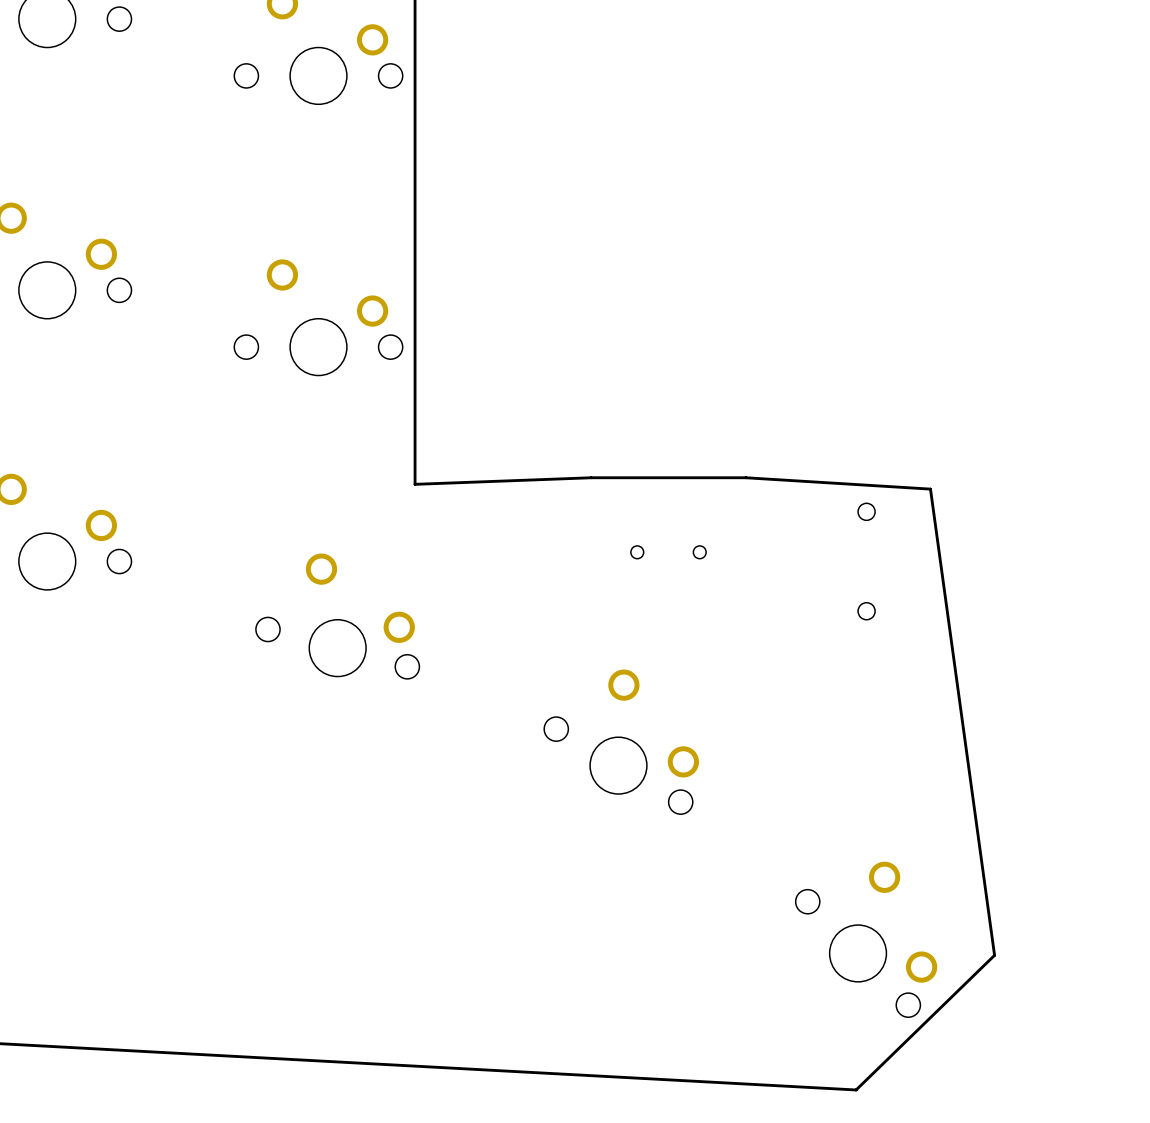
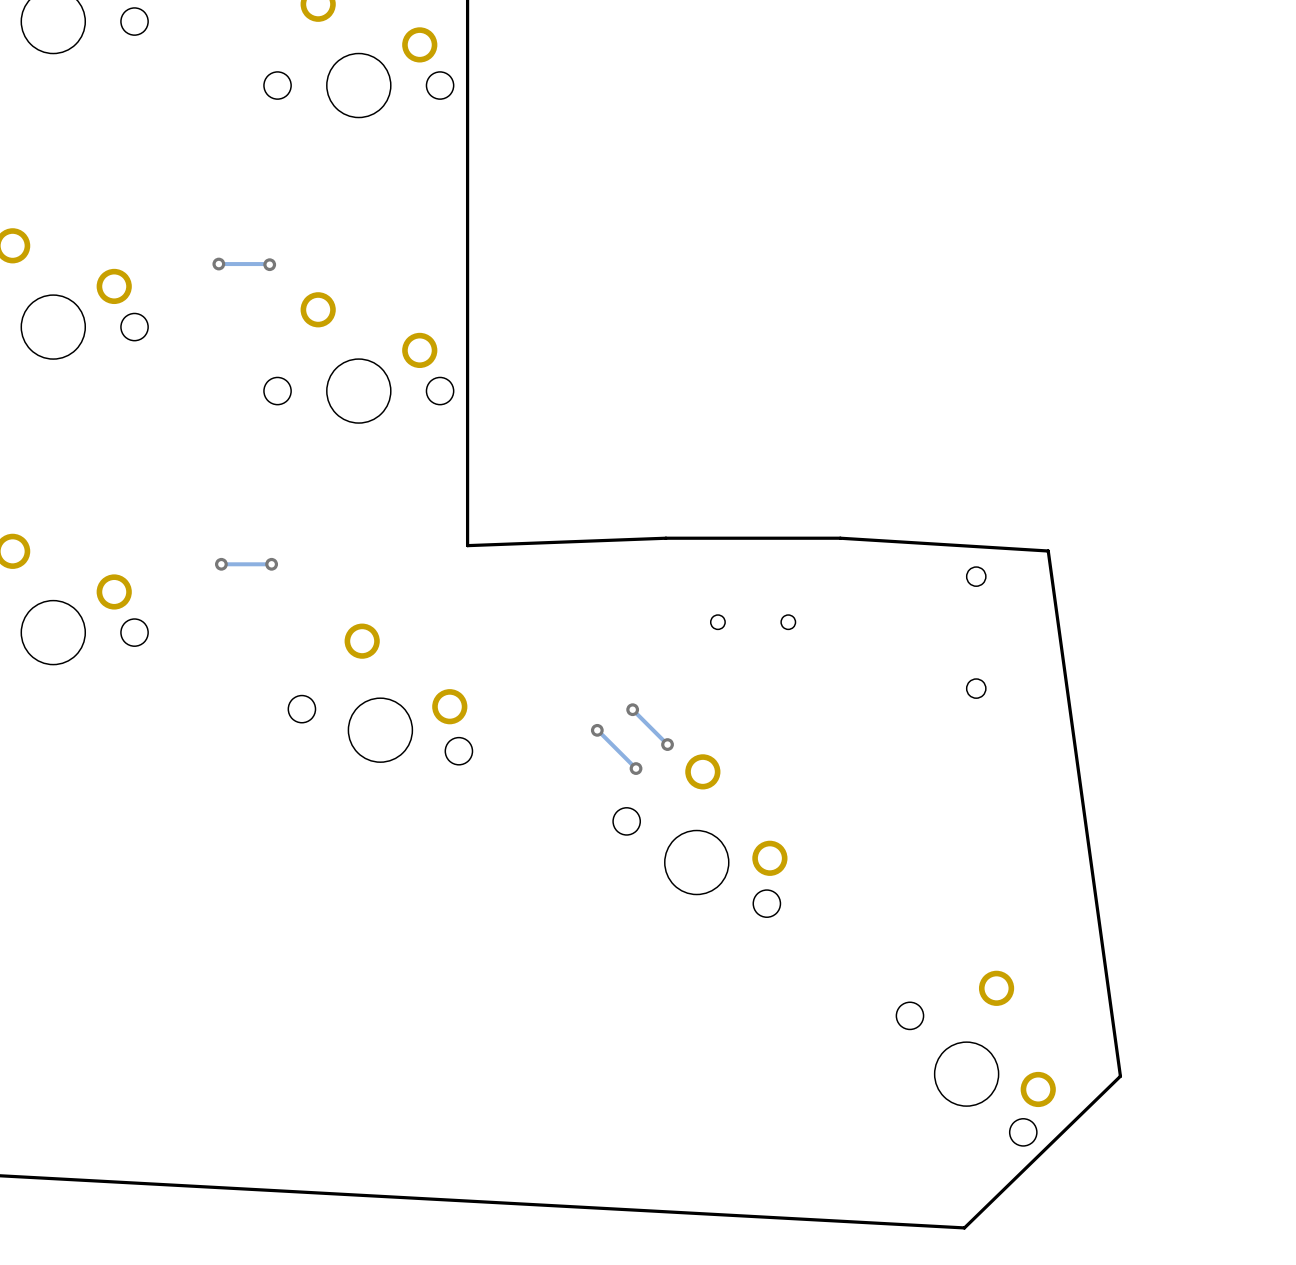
track: none -> (218, 264) (269, 264)
via: none -> (218, 264)
via: none -> (269, 264)
via: none -> (221, 564)
track: none -> (271, 564) (221, 564)
via: none -> (271, 564)
track: none -> (632, 709) (667, 744)
via: none -> (632, 709)
track: none -> (597, 730) (636, 768)
via: none -> (597, 730)
via: none -> (667, 744)
via: none -> (636, 768)

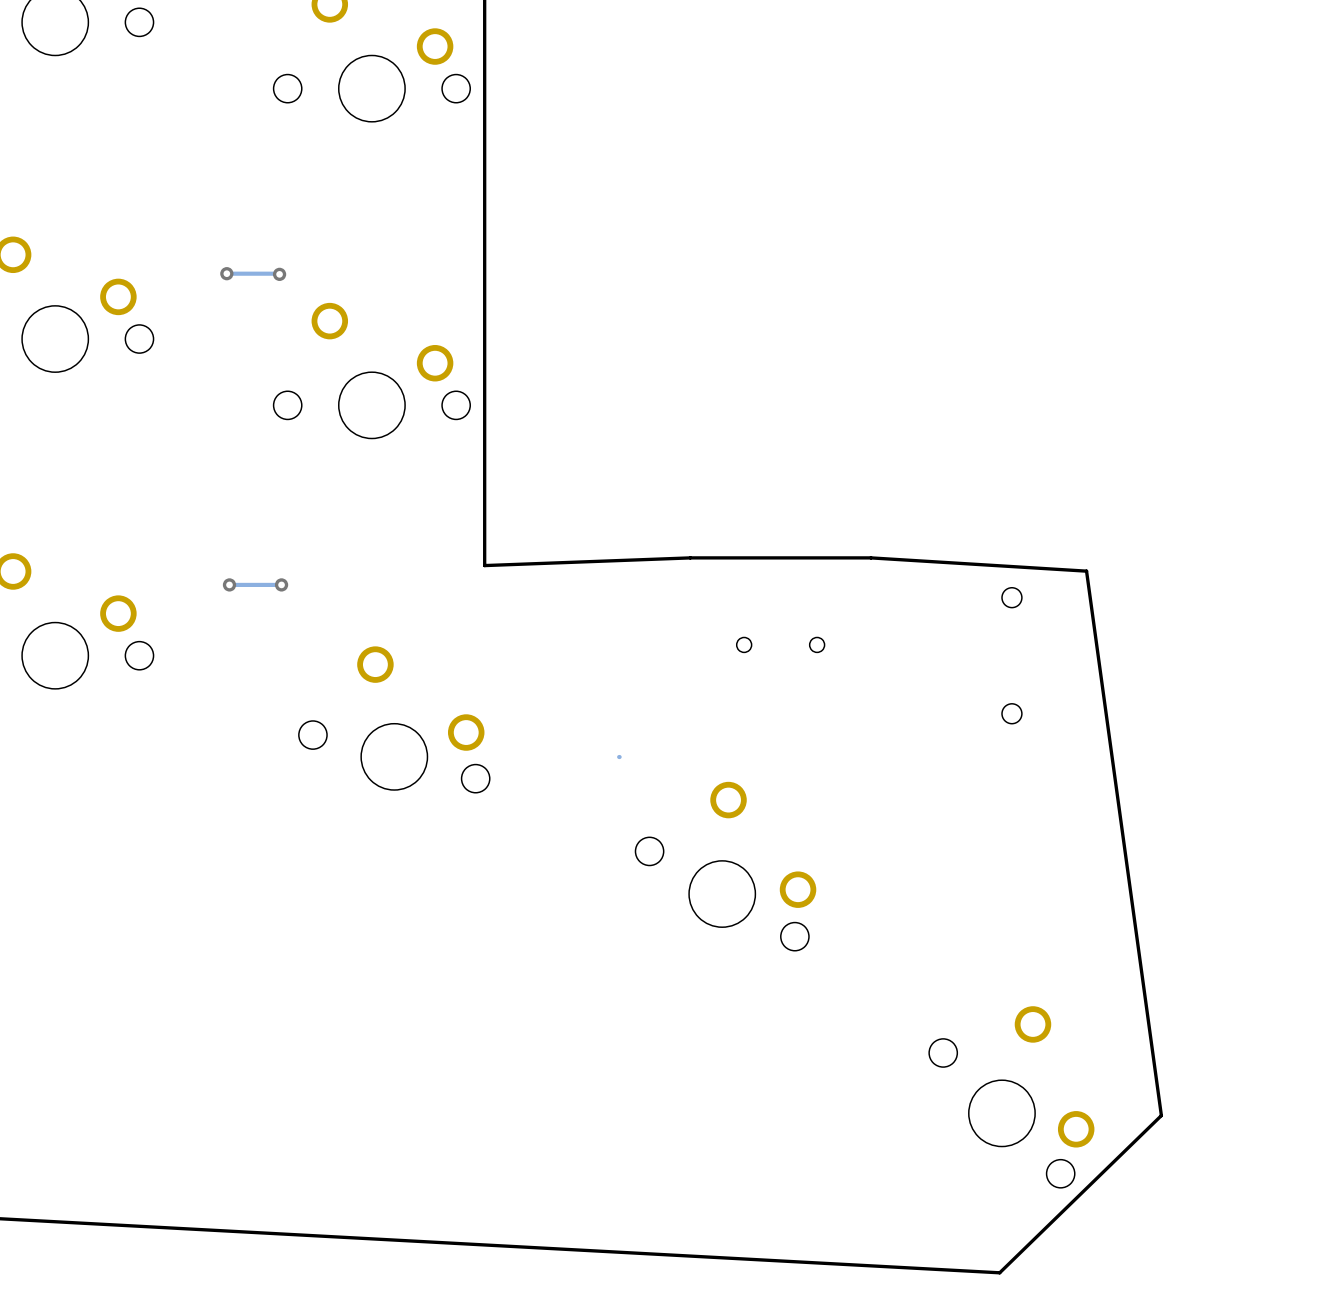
track: (632, 709) (667, 744) -> none
via: (632, 709) -> none
track: (597, 730) (636, 768) -> none
via: (597, 730) -> none
via: (667, 744) -> none
via: (636, 768) -> none

